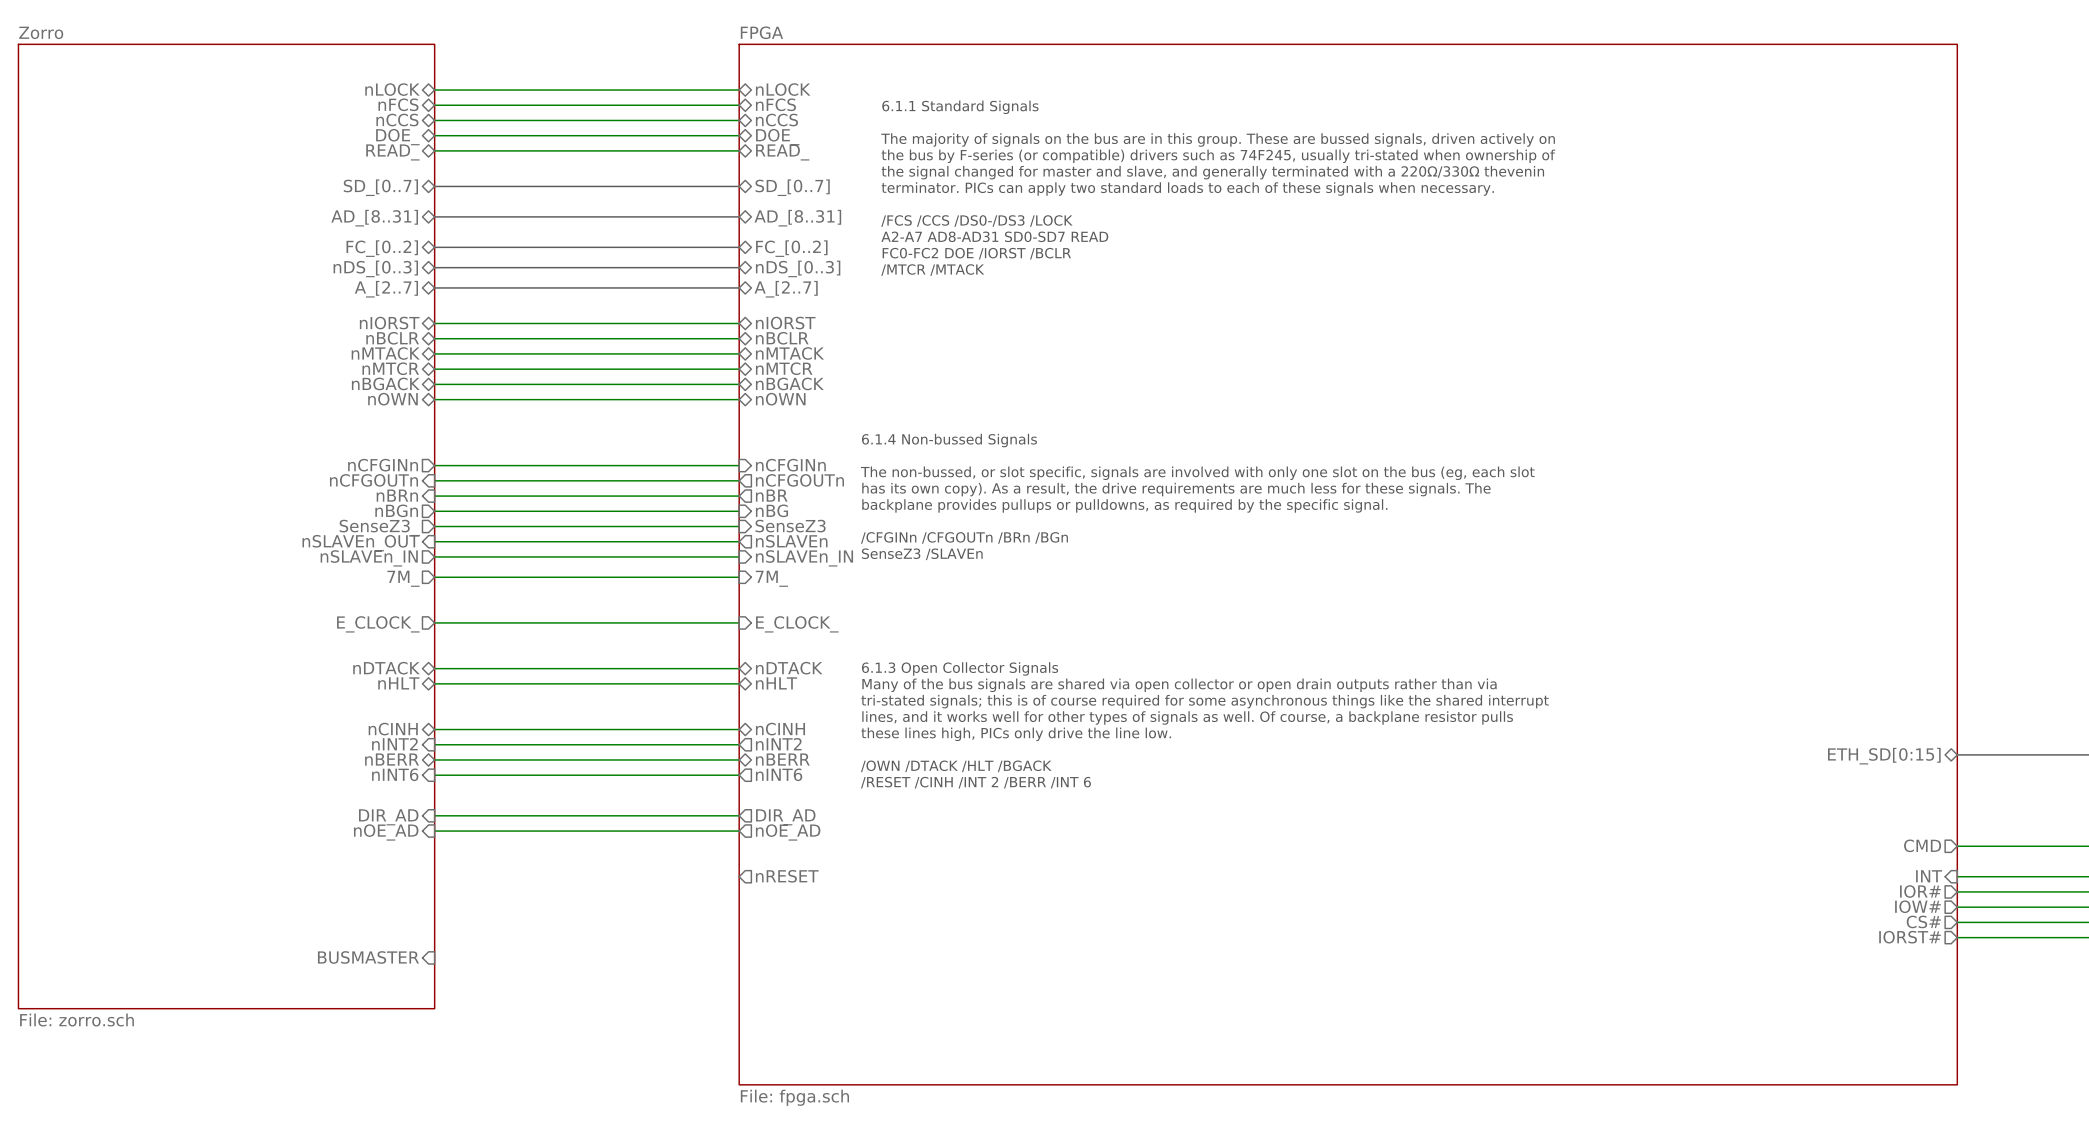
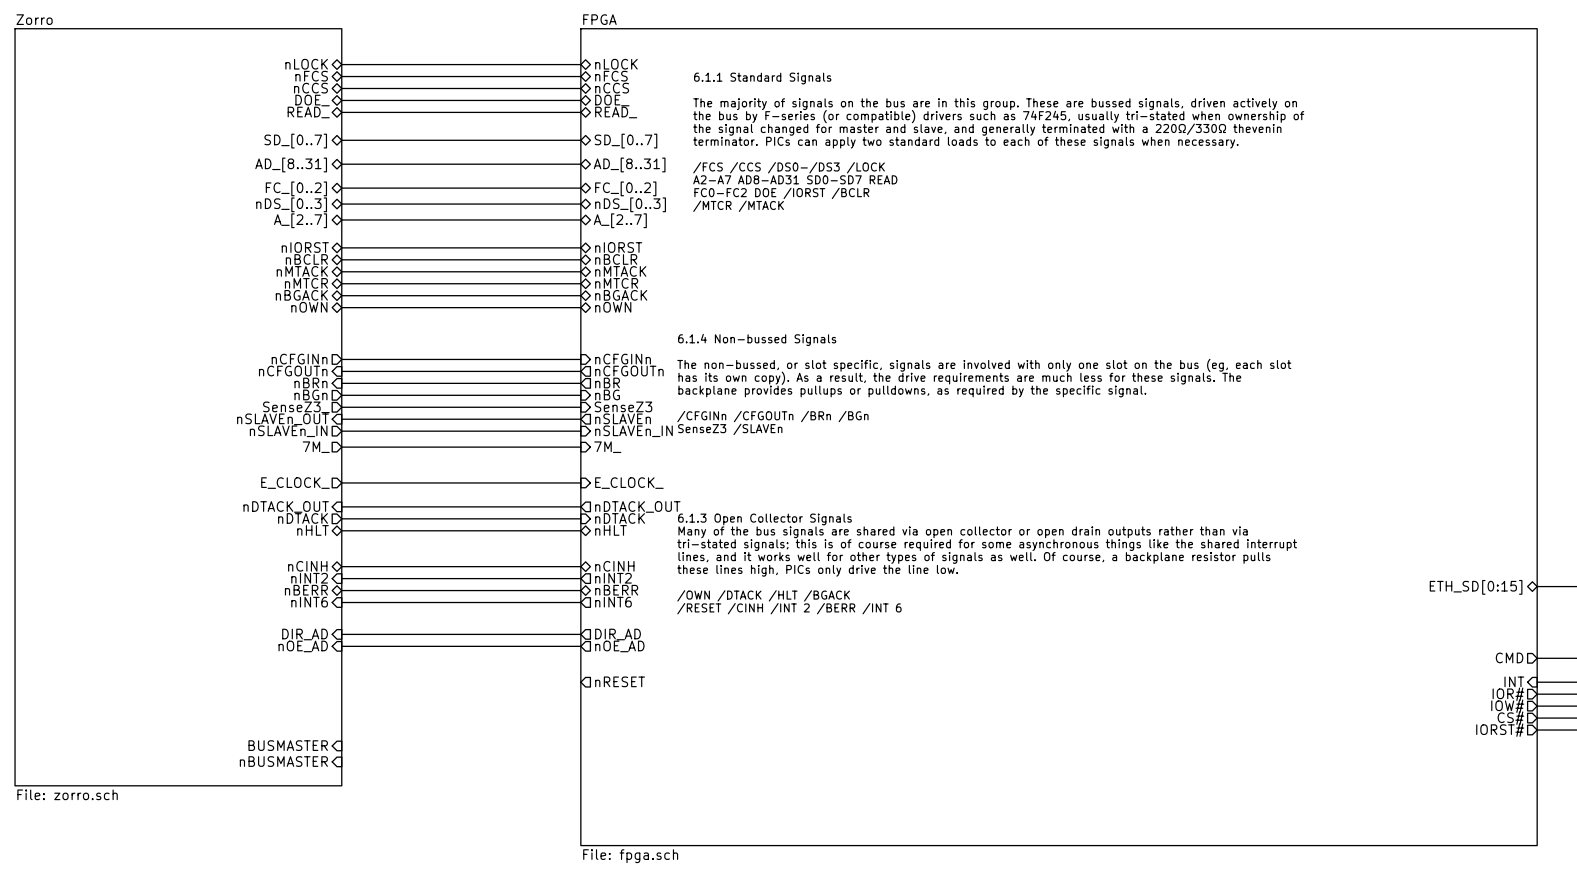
wire: none -> (341, 506) (580, 506)
sheet pin: none -> nDTACK_OUT (286, 506)
sheet pin: none -> nDTACK_OUT (637, 506)
sheet pin shape: bidirectional (386, 668) -> output (303, 518)
sheet pin shape: bidirectional (789, 668) -> input (620, 518)
sheet pin: none -> nBUSMASTER (283, 761)

